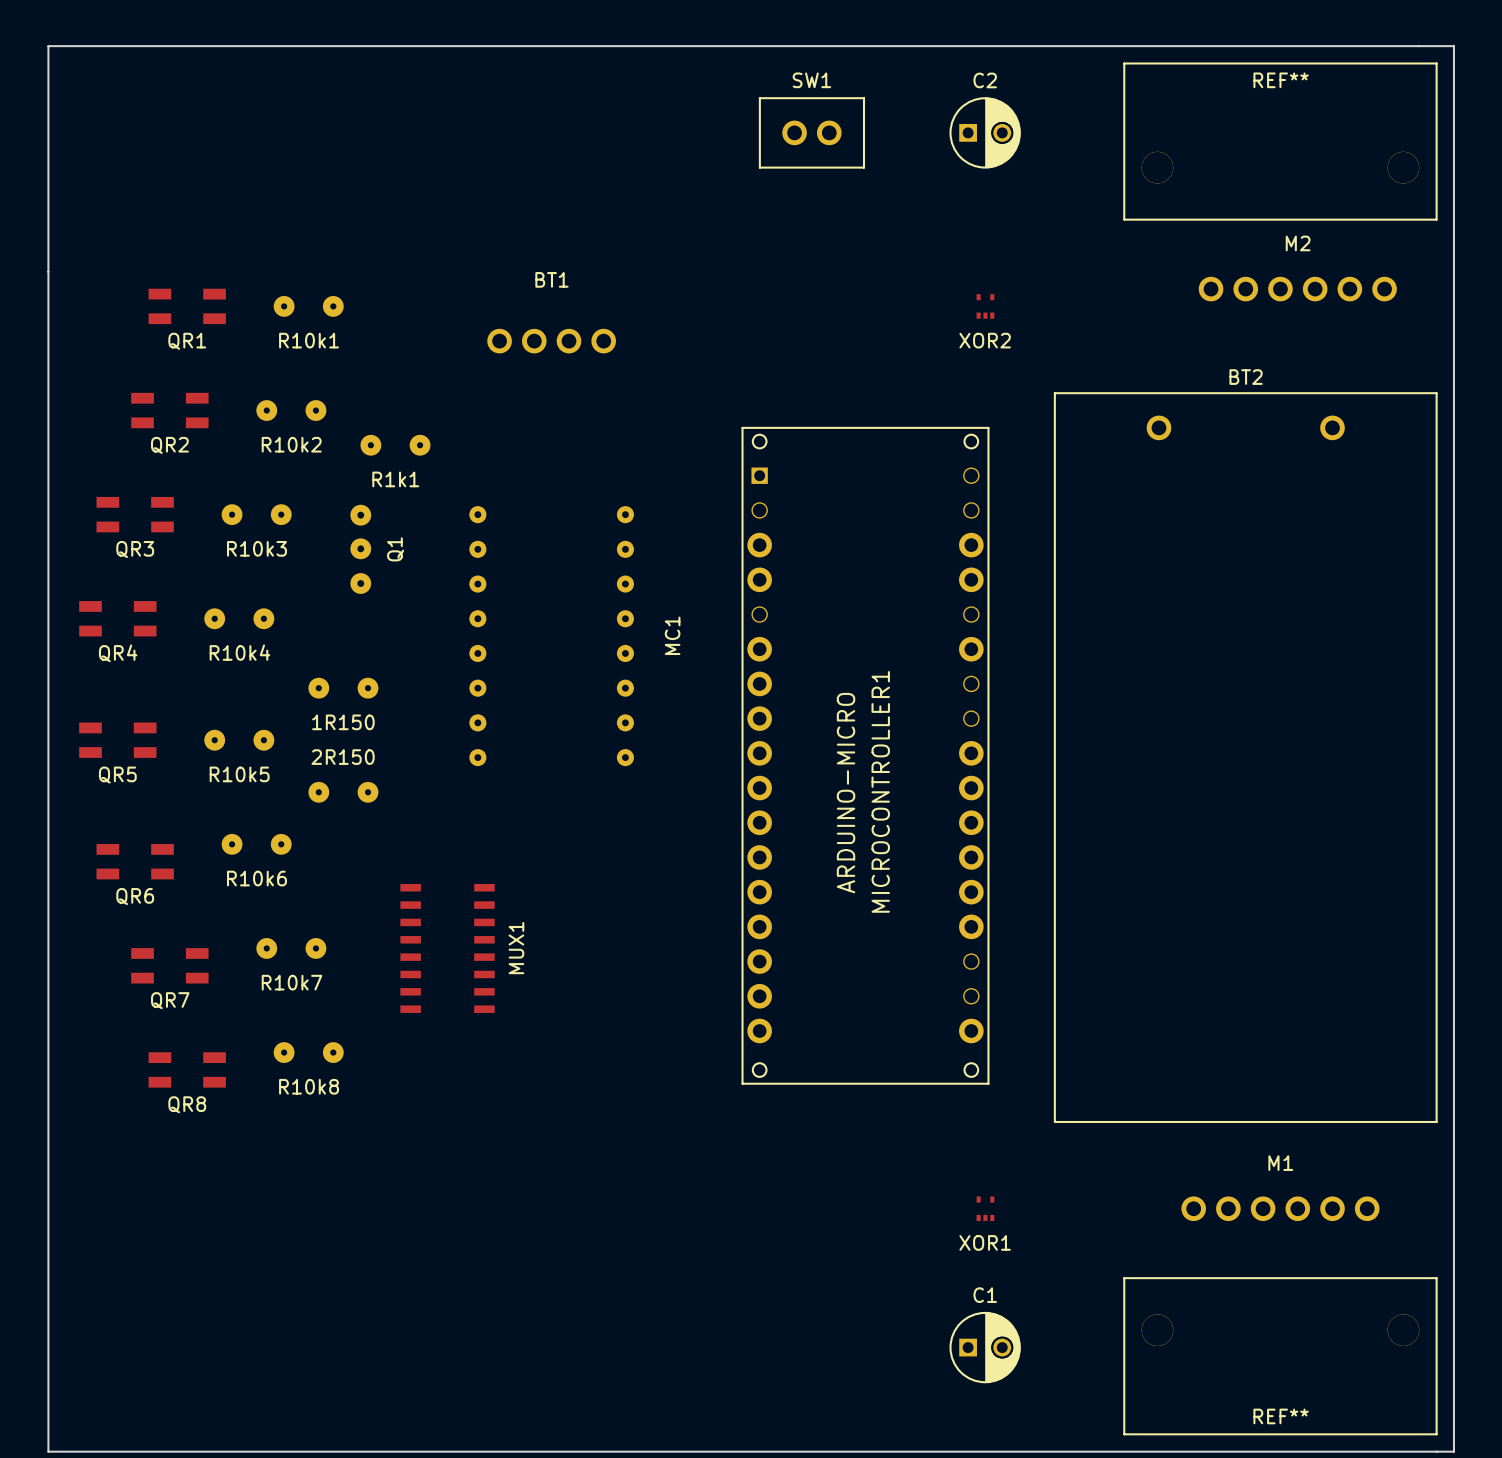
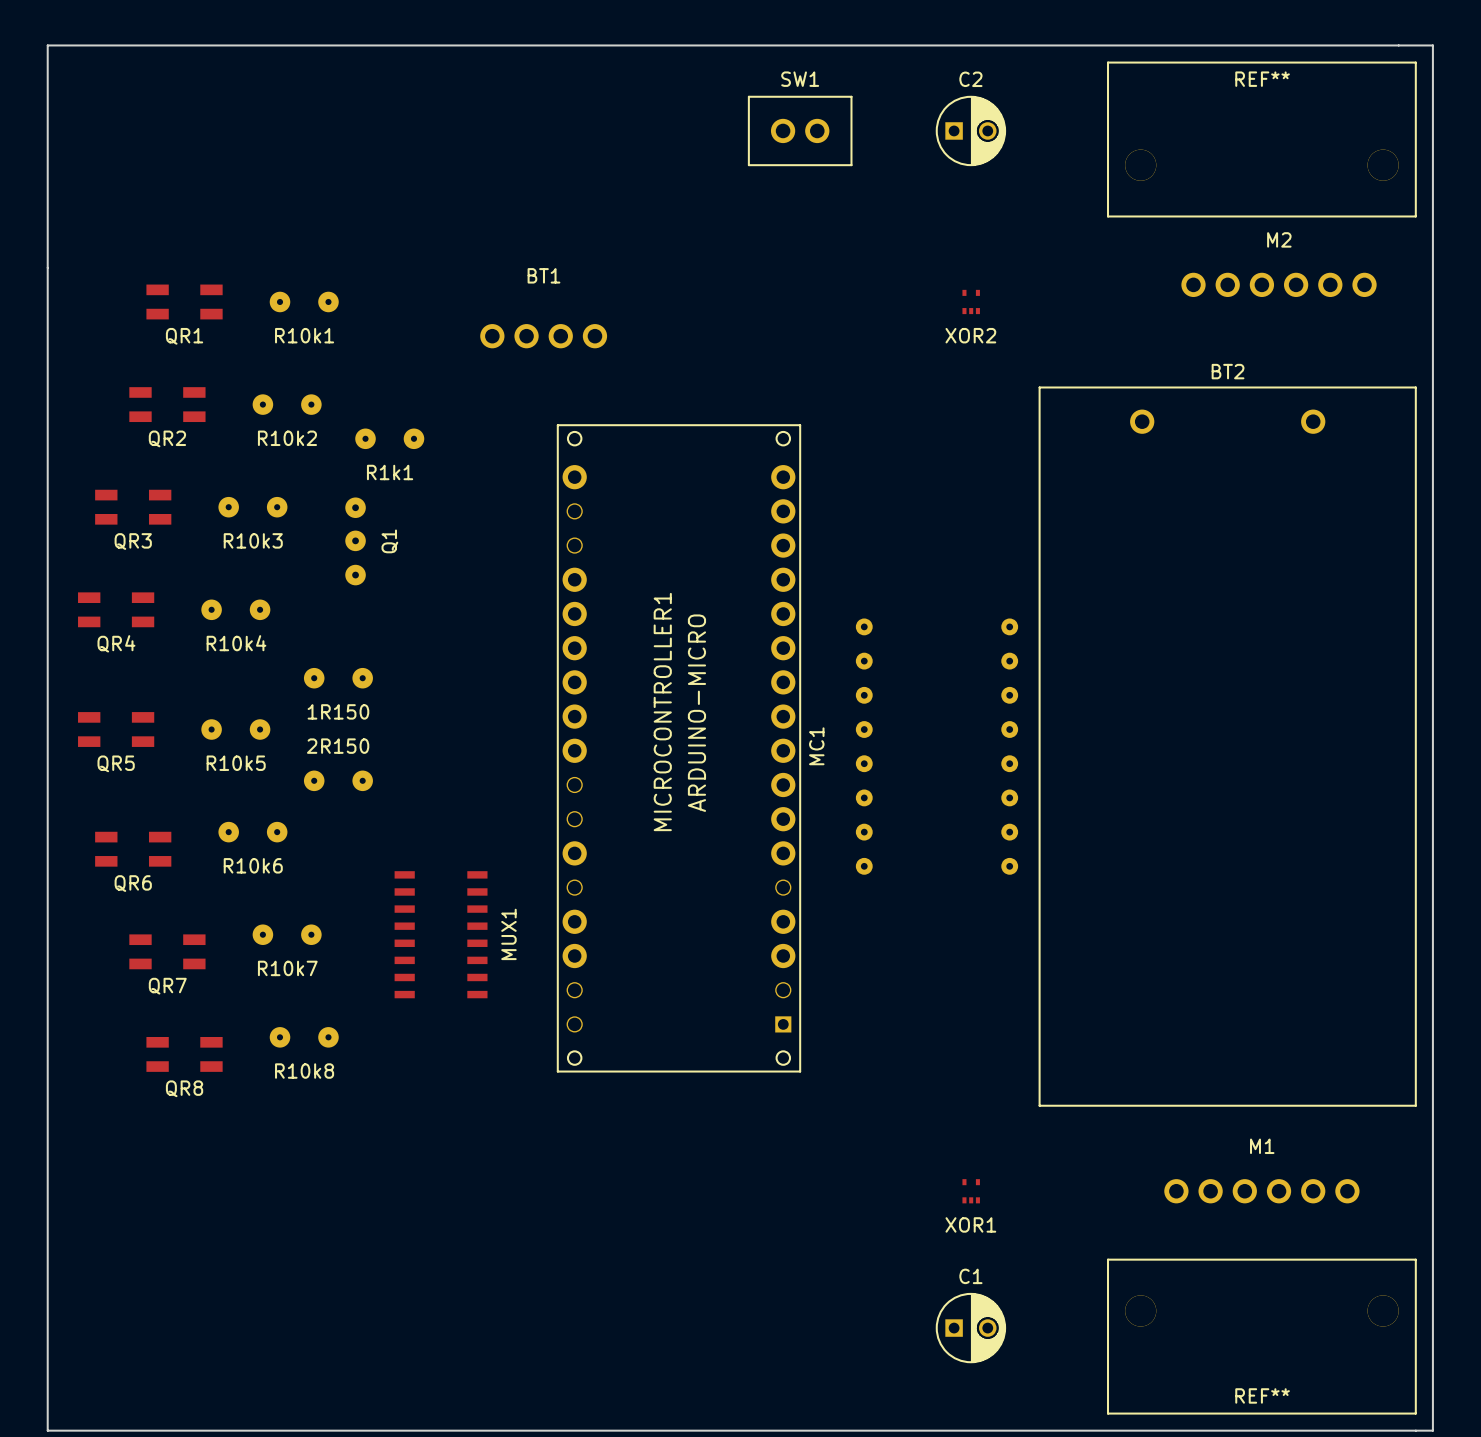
MC1 name position: MC1 (672, 635) -> MC1 (816, 746)
MC1 position: (551, 636) -> (936, 746)
MICROCONTROLLER1 rotation: 0° (865, 755) -> 180° (678, 748)

